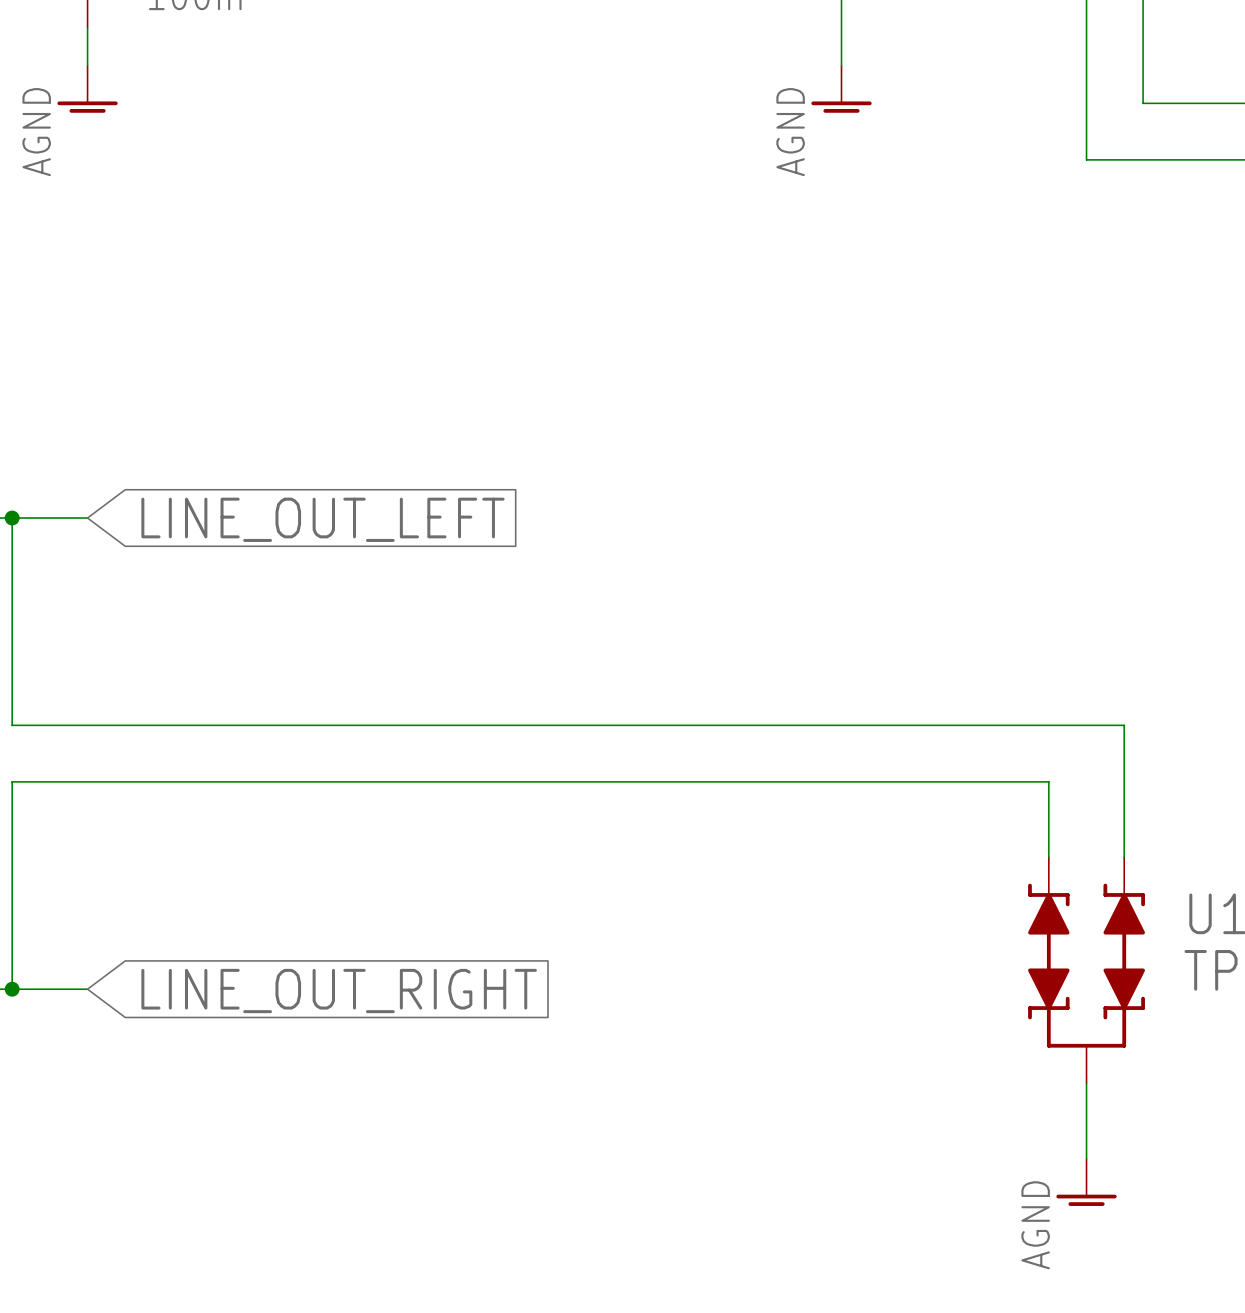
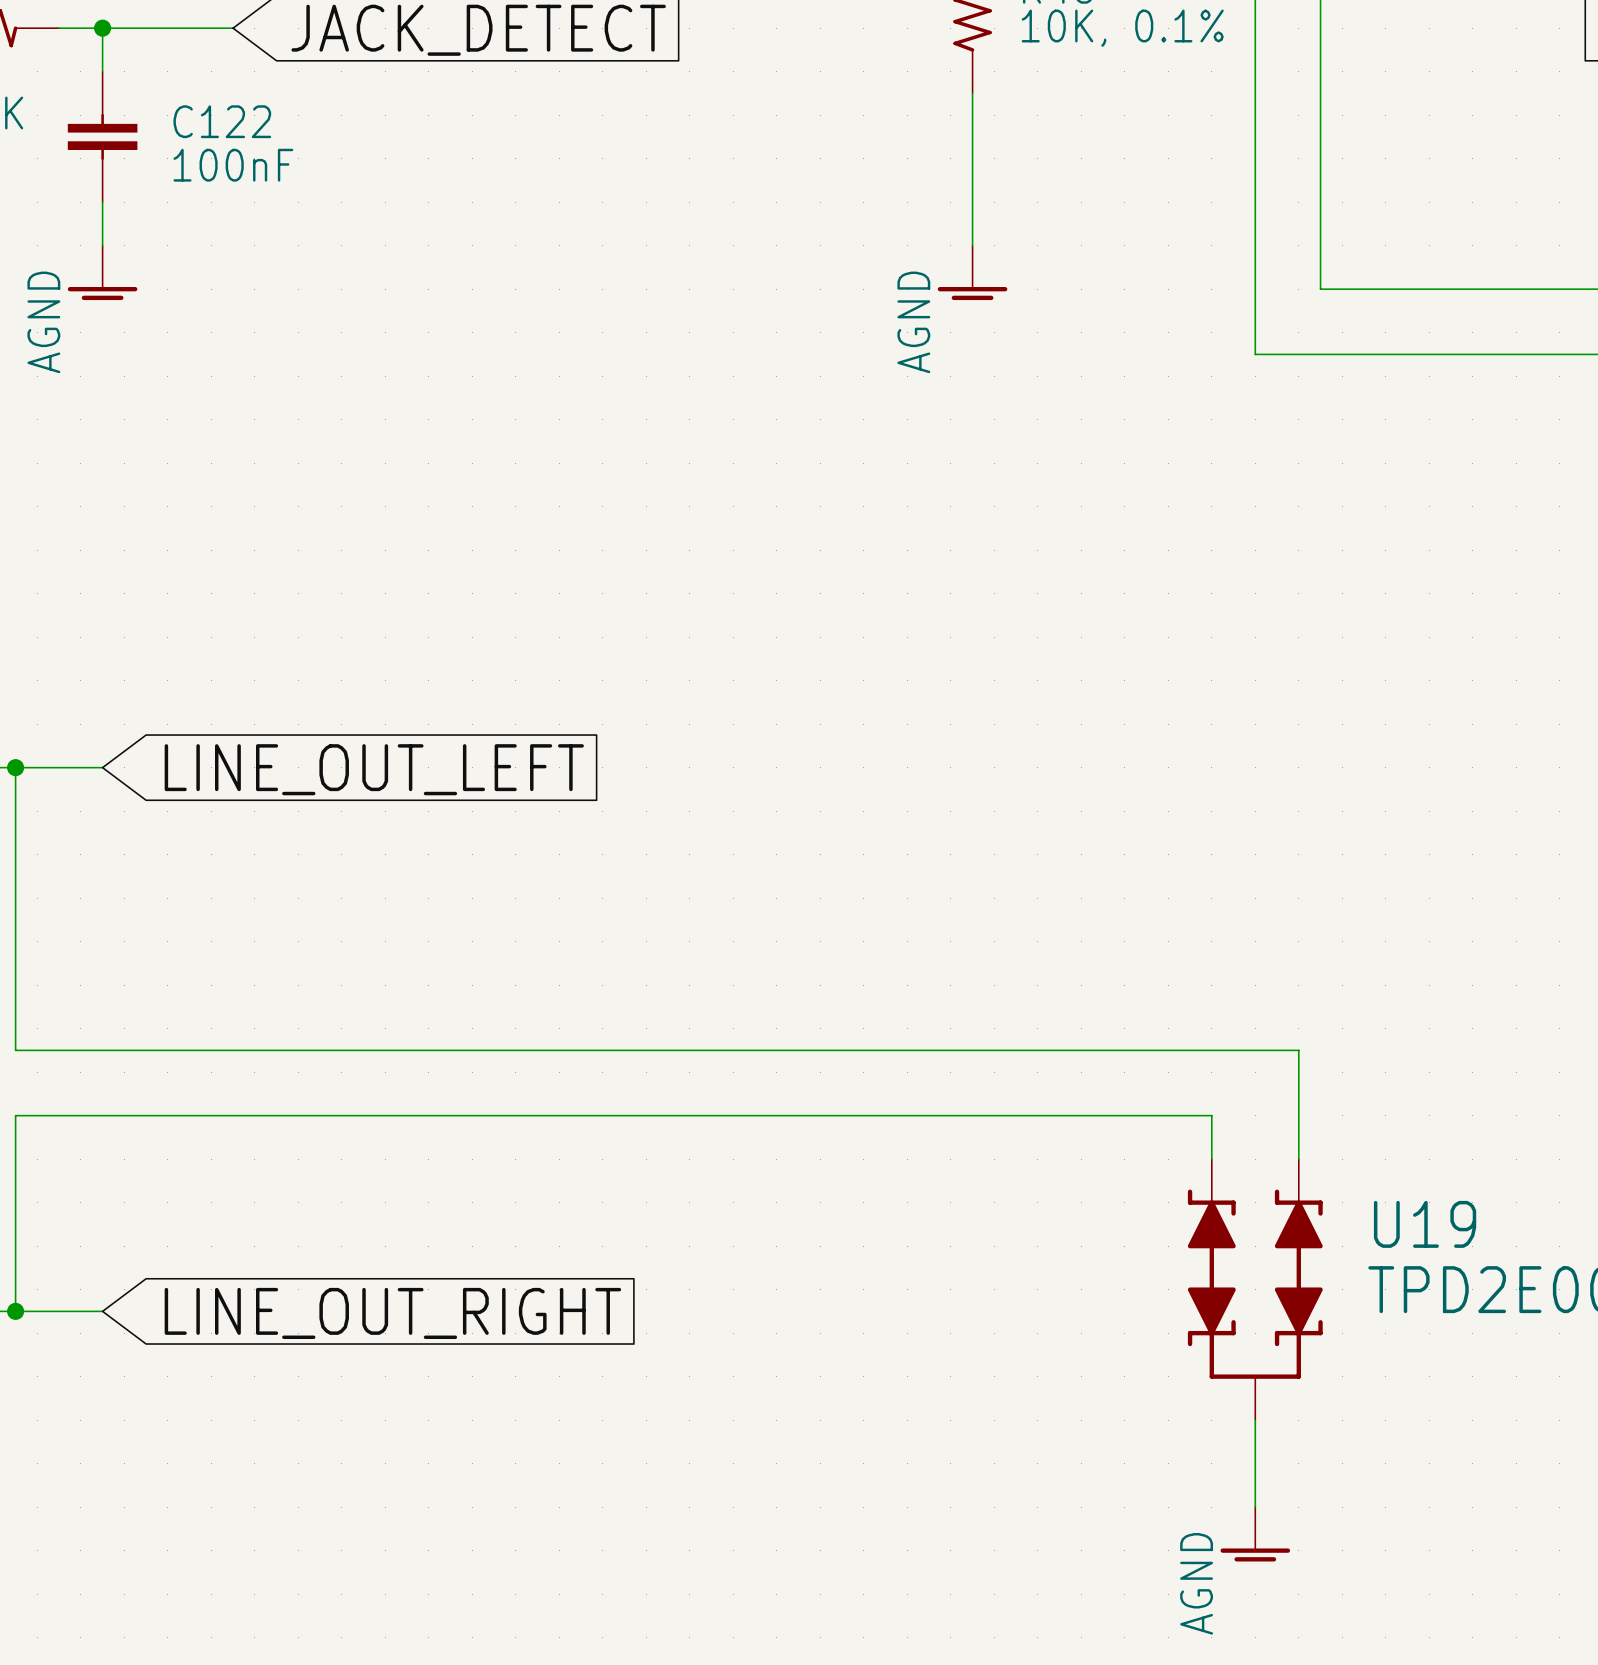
wire: (12, 725) (1124, 725) (1124, 763) -> (15, 1006) (15, 1050) (1298, 1050)
wire: (12, 819) (12, 781) (1048, 781) (1048, 819) -> (15, 1115) (1211, 1115)

